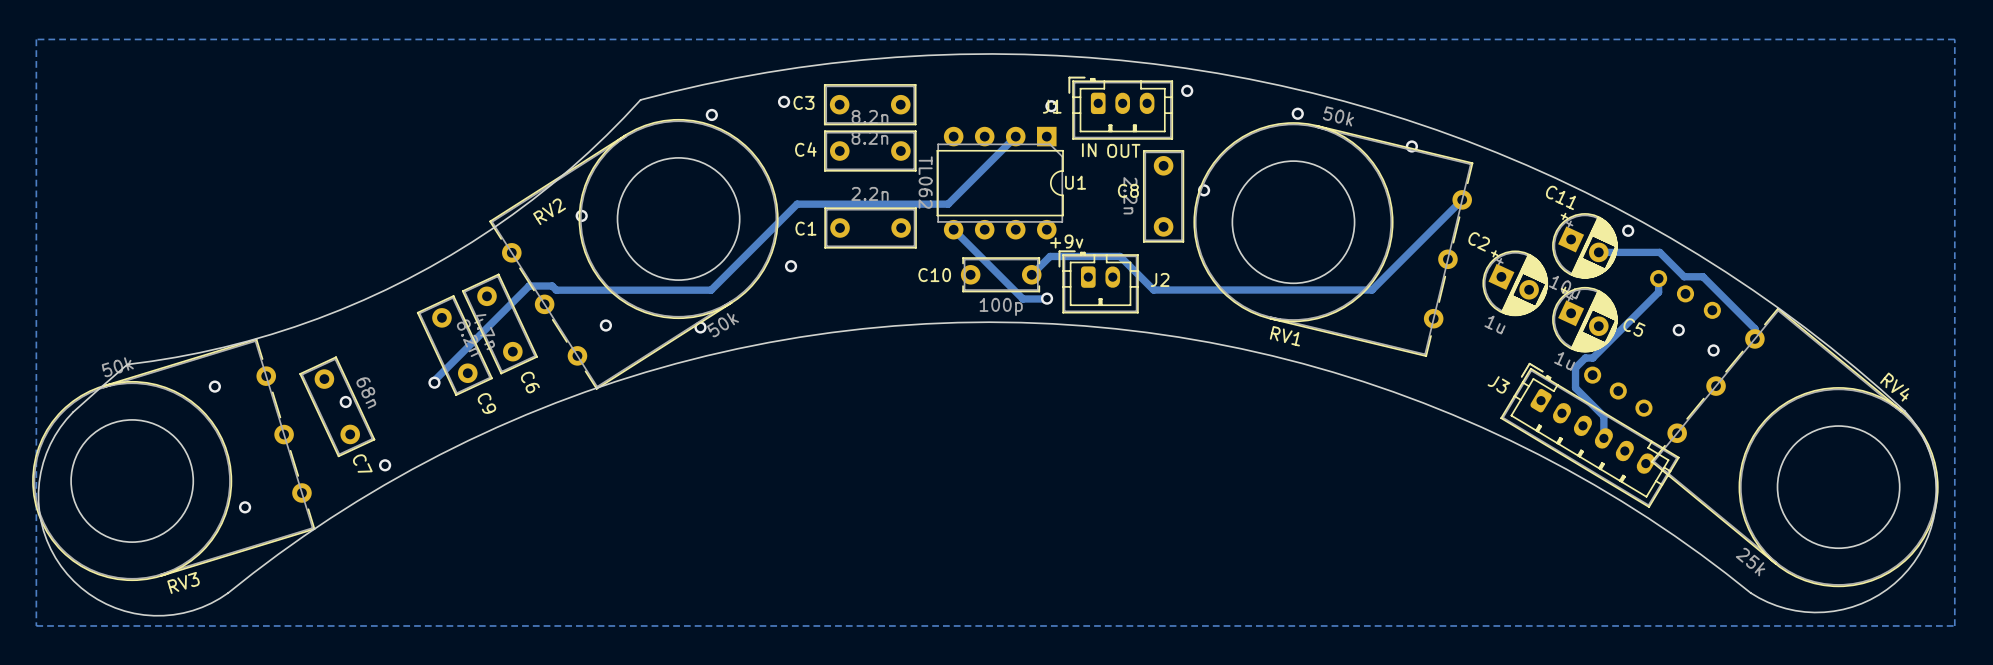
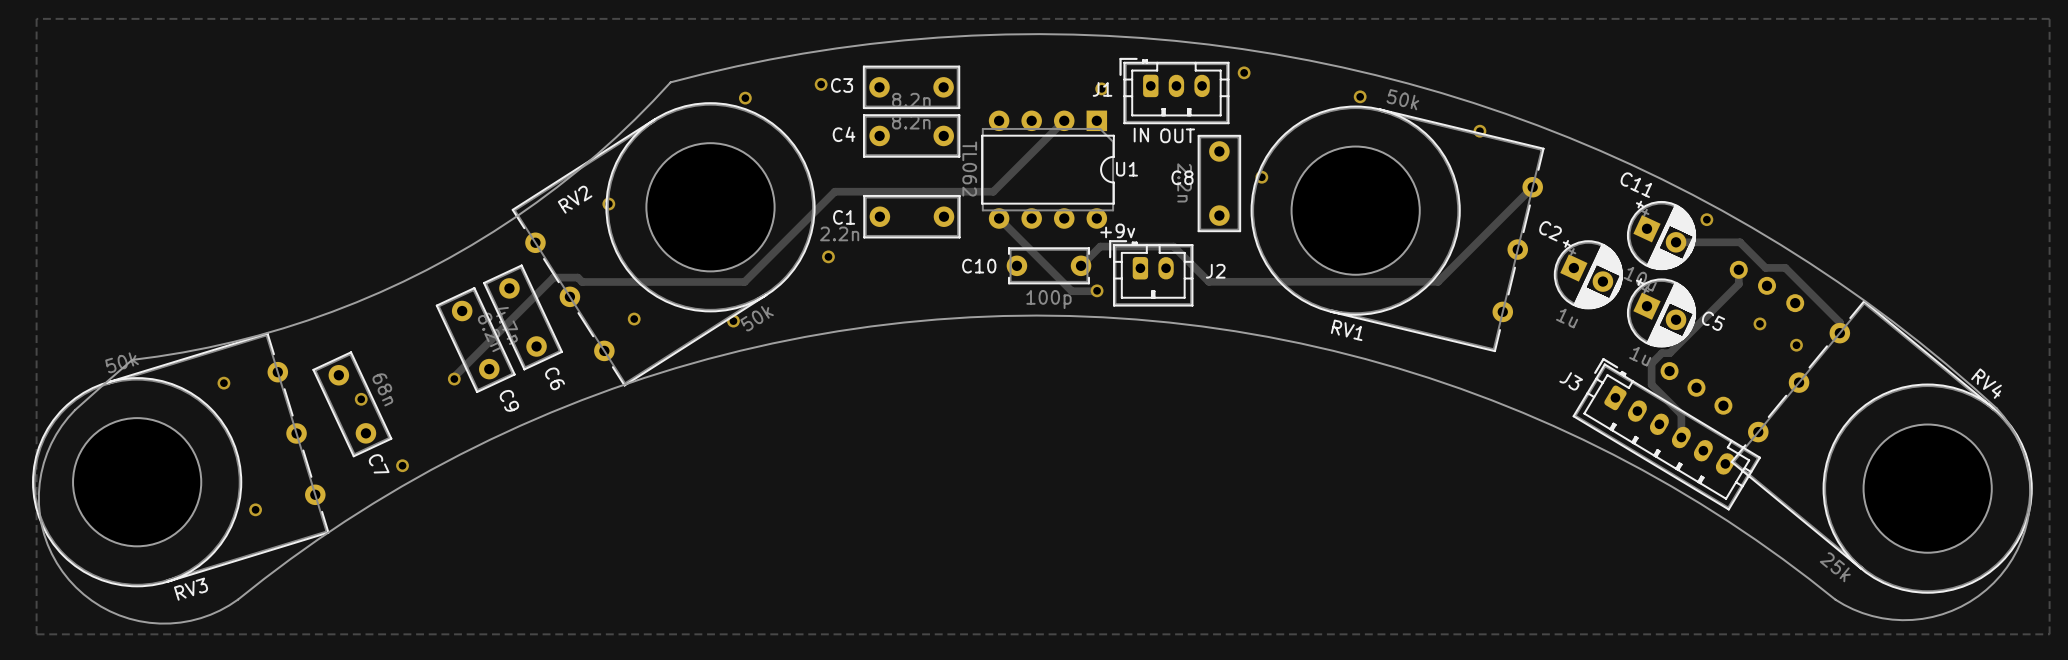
C1 value position: 2.2n (869, 193) -> 2.2n (839, 233)

